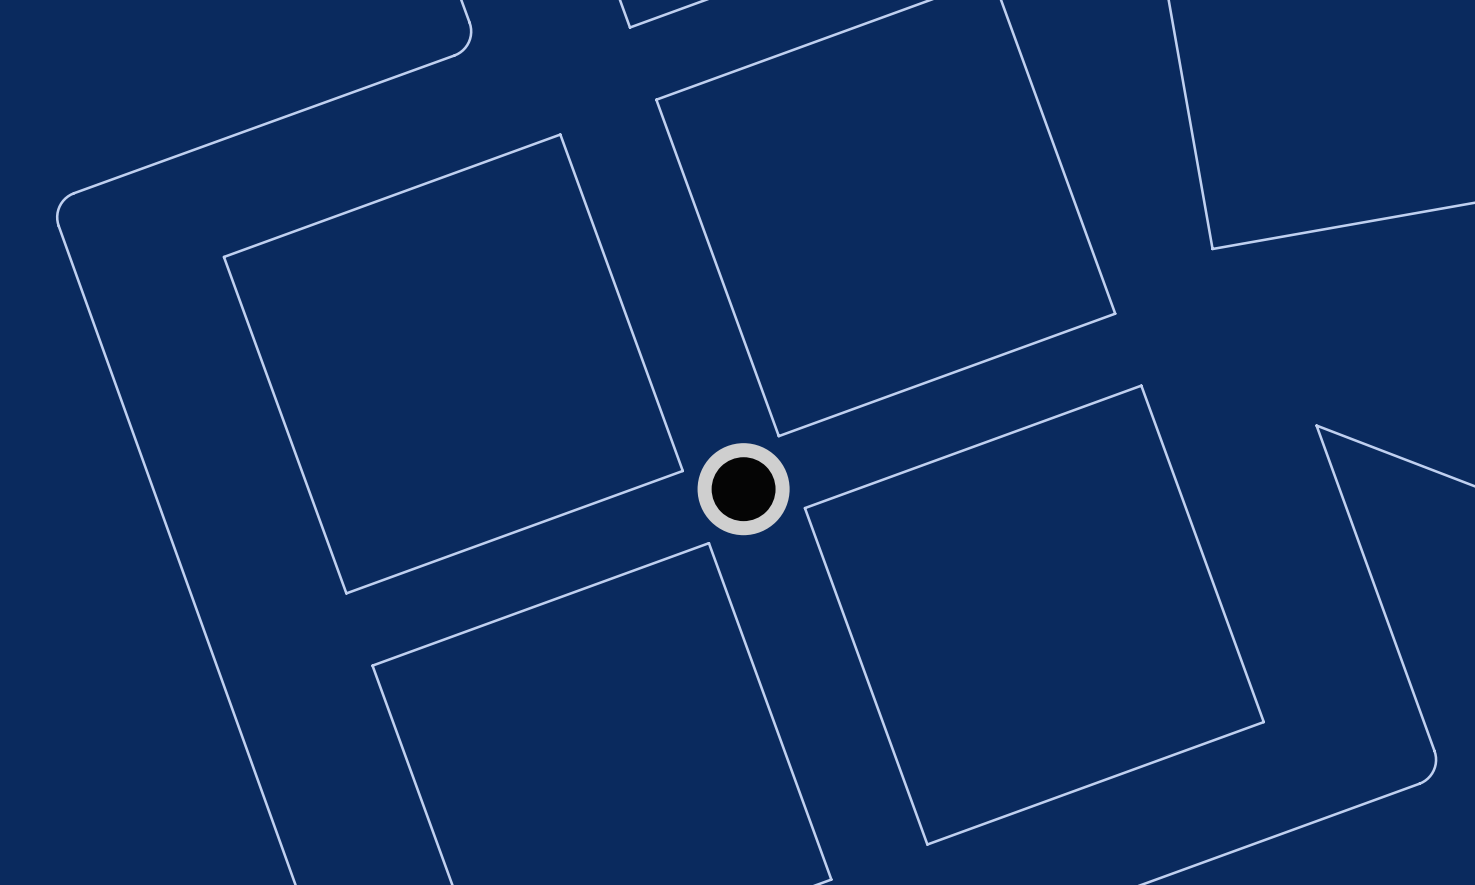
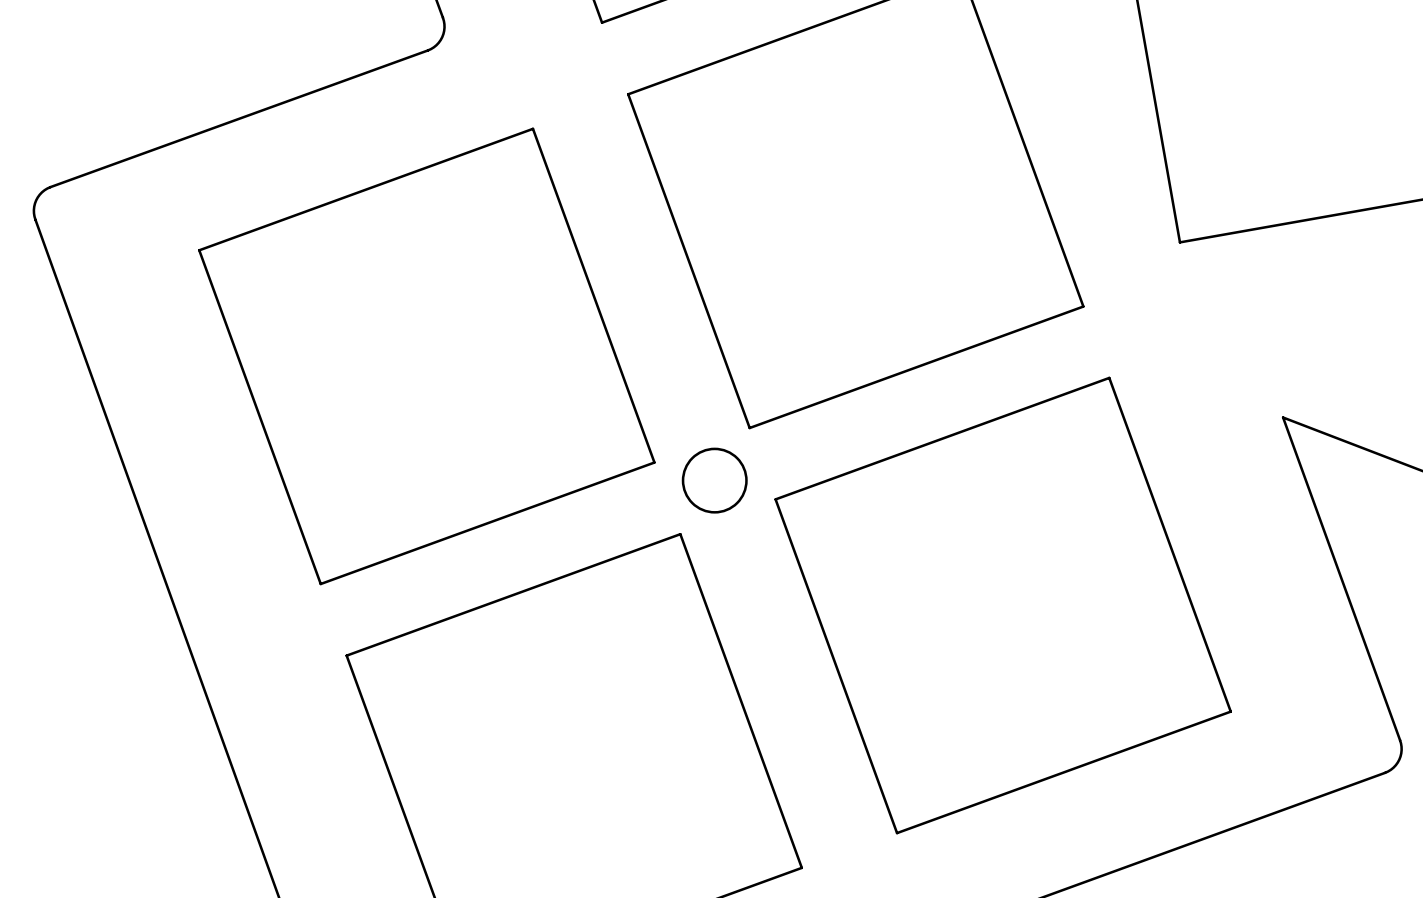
round board edge: none -> [681, 447, 748, 514]
part: (743, 489) -> none

